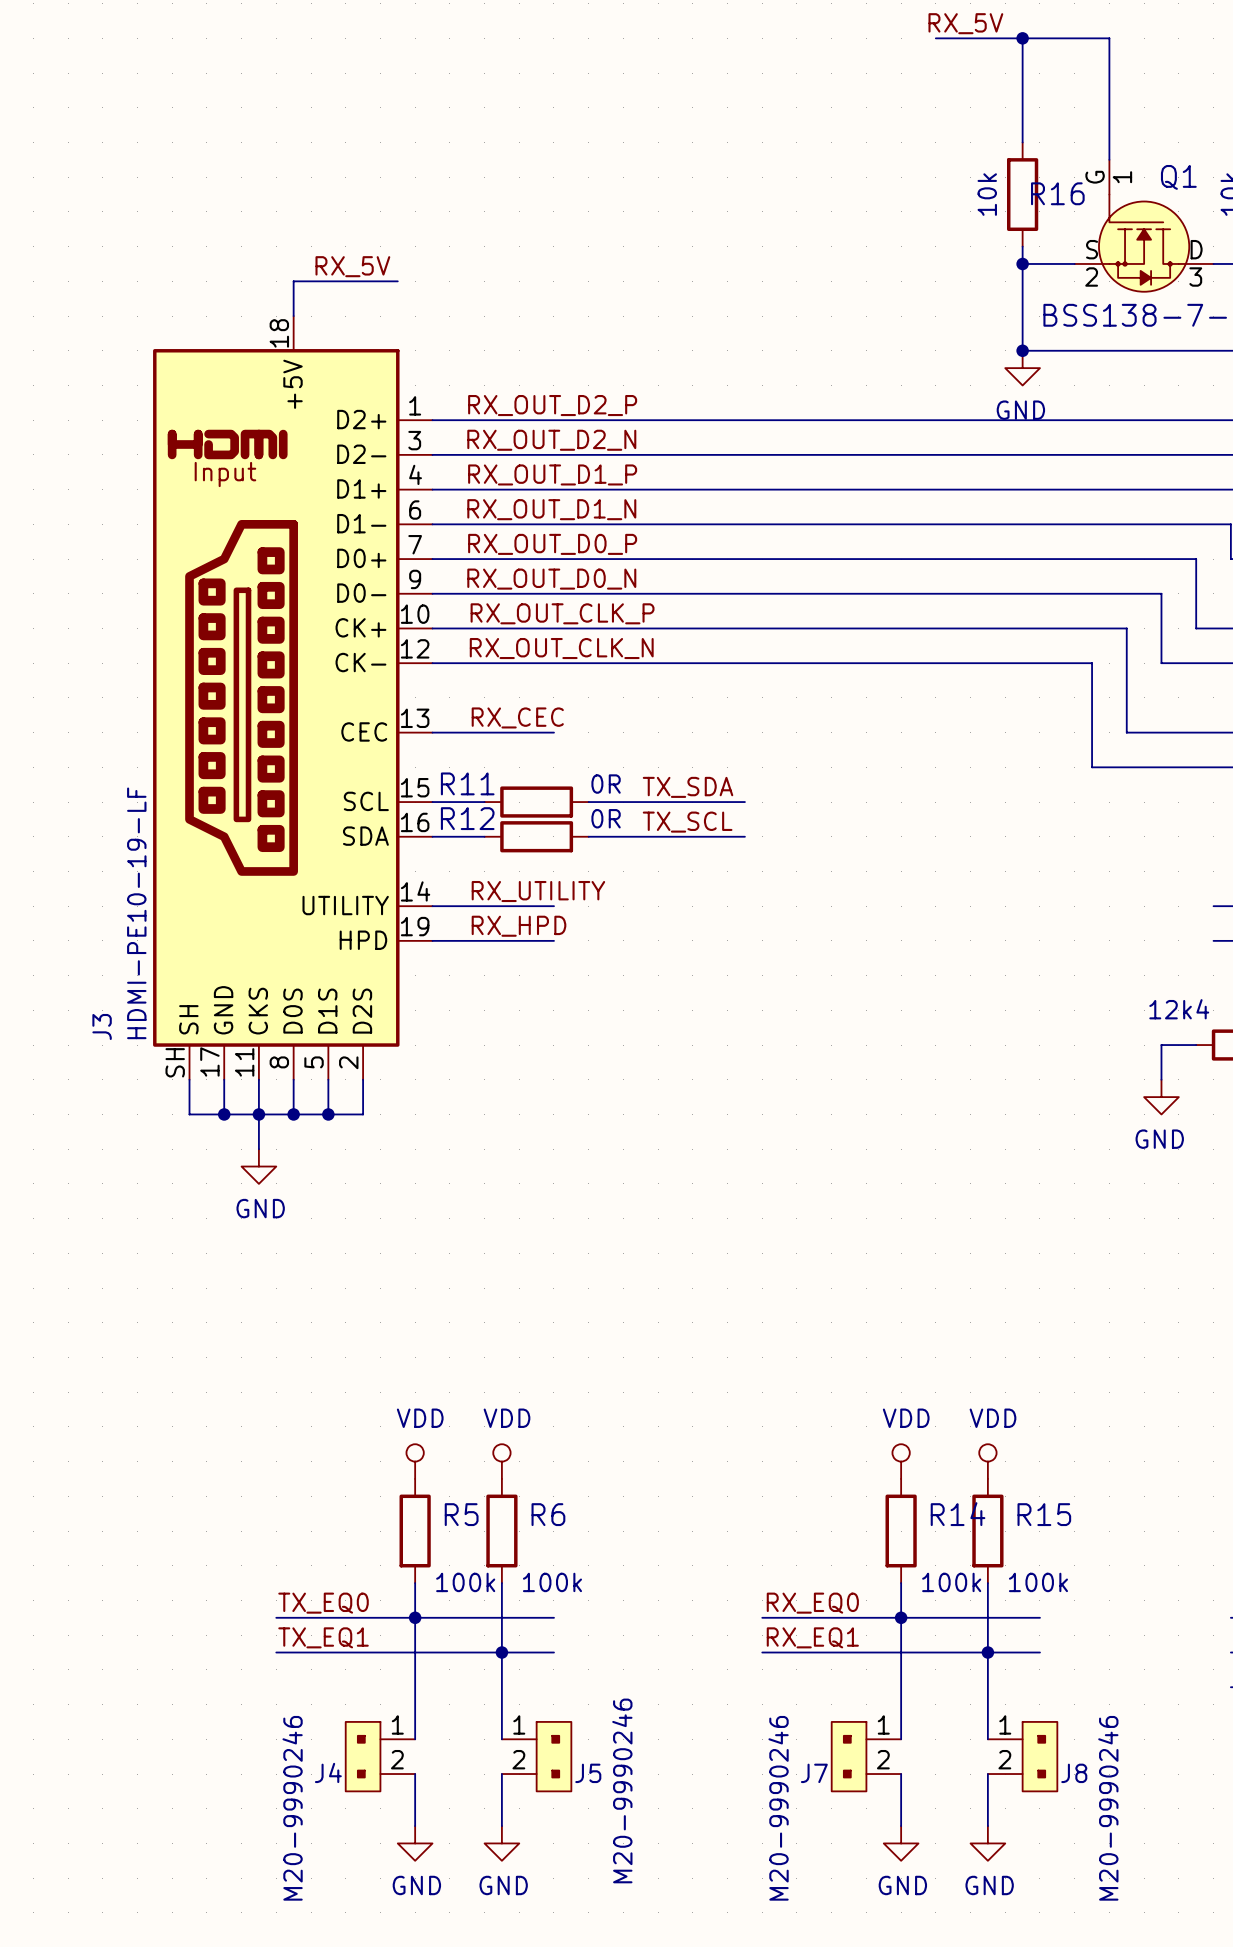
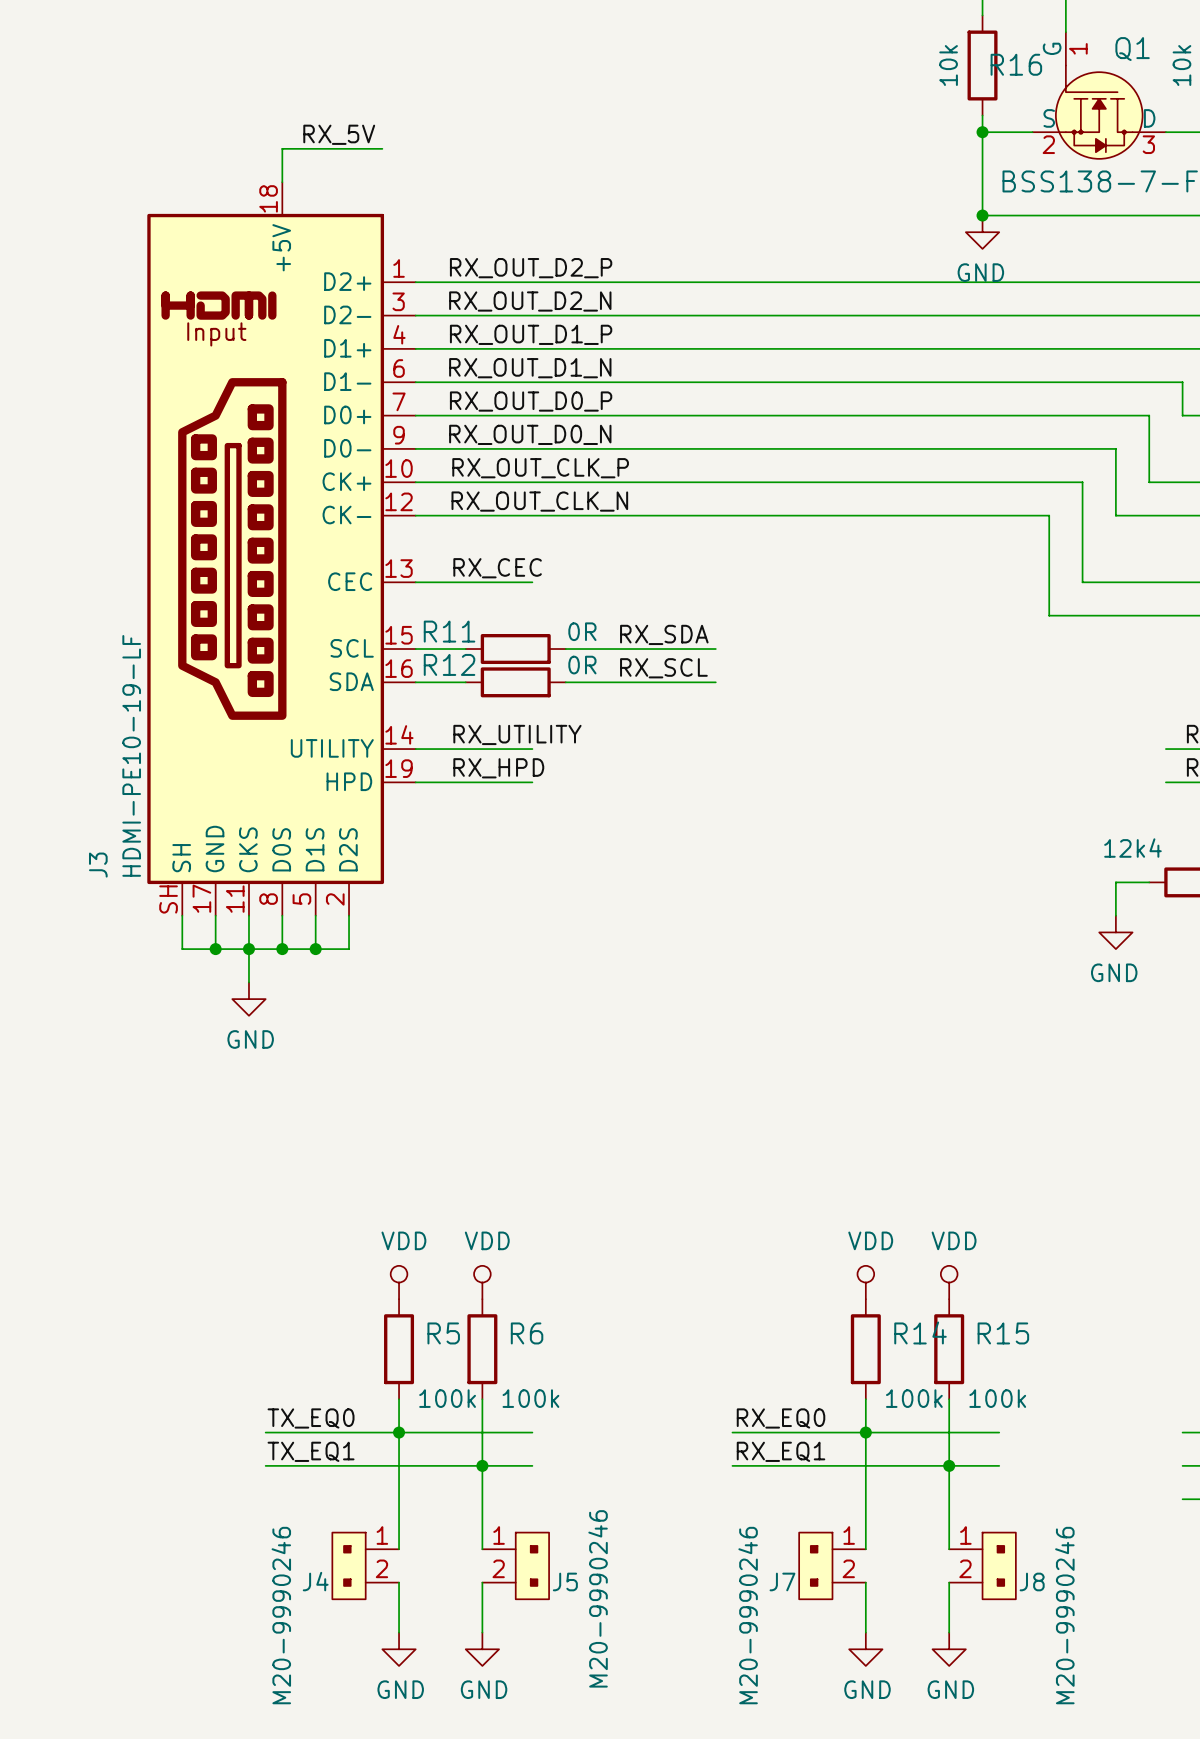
label: TX_SDA (688, 787) -> RX_SDA (664, 634)
label: TX_SCL (687, 822) -> RX_SCL (663, 668)

